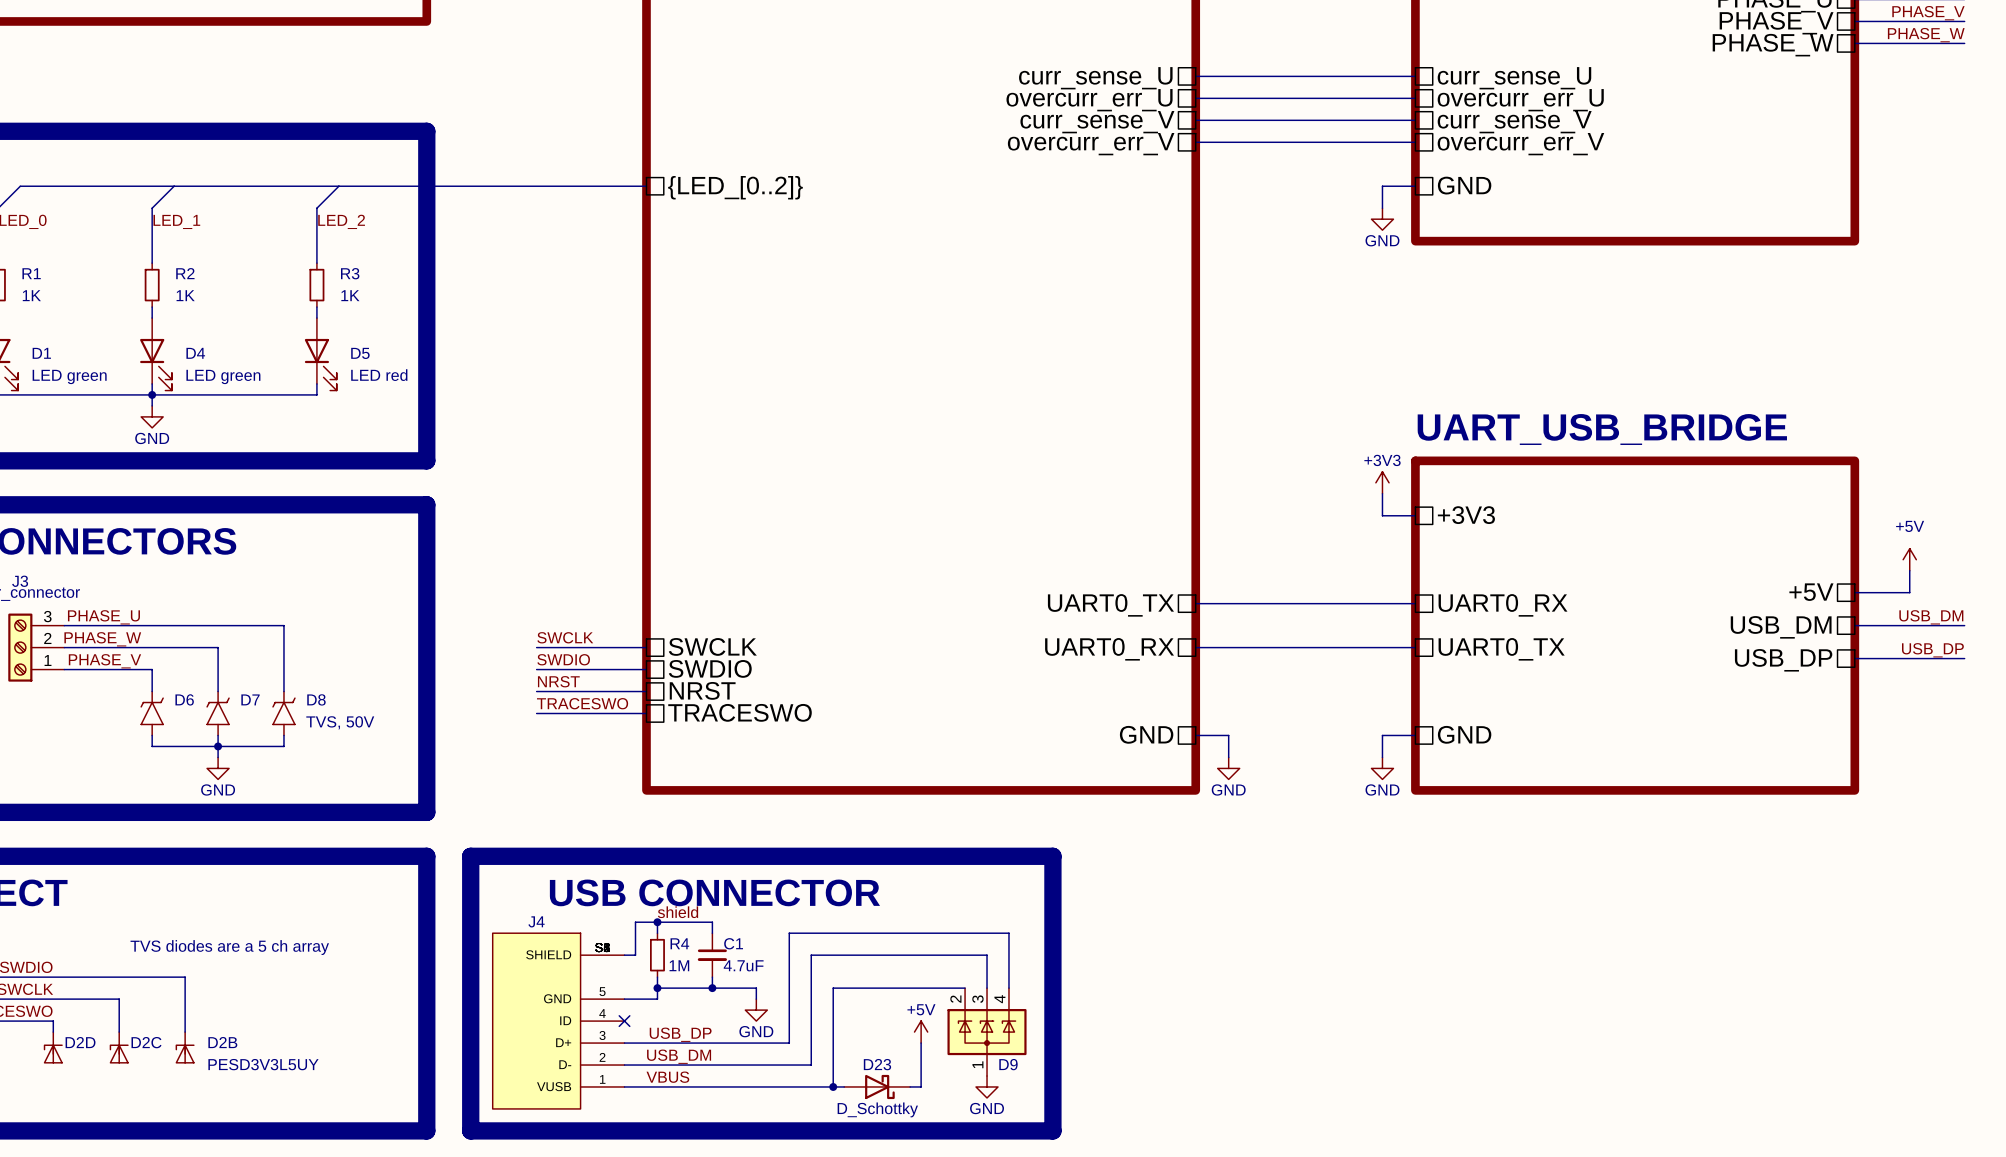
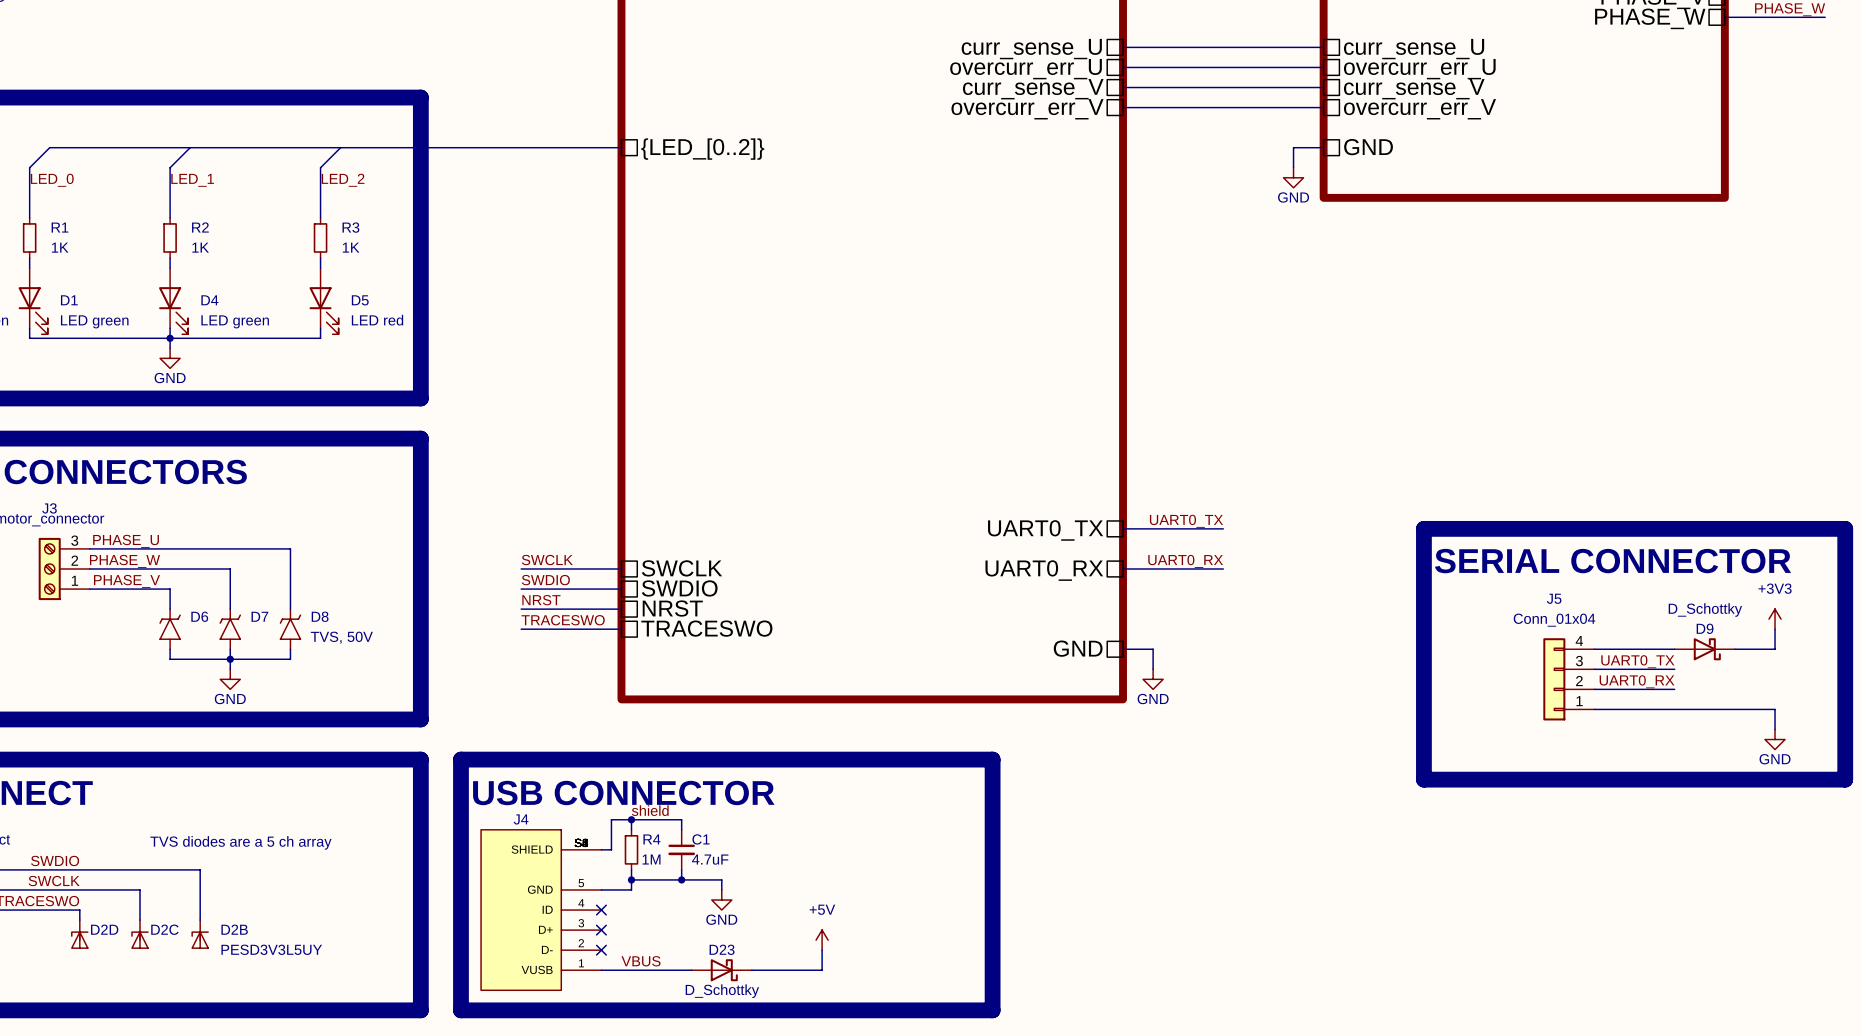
power symbol: +3V3 (1382, 482) -> none
wire: (1382, 493) (1382, 515) (1415, 515) -> none
sheet pin: +3V3 (1466, 515) -> none
power symbol: +5V (1909, 559) -> none
wire: (1909, 570) (1909, 592) (1854, 592) -> none
sheet pin: +5V (1811, 592) -> none
label: none -> UART0_TX (1186, 521)
wire: (1305, 603) (1415, 603) -> none
line: none -> (1423, 528) (1845, 528) (1845, 779) (1423, 779) (1423, 528)
sheet pin: UART0_RX (1503, 605) -> none
label: USB_DM (1931, 617) -> none
sheet UART_USB_BRIDGE: (1635, 625) -> none
wire: (1854, 625) (1964, 625) -> none
sheet pin: USB_DM (1781, 627) -> none
text: none -> SERIAL CONNECTOR (1613, 561)
label: none -> UART0_RX (1185, 561)
wire: (1305, 647) (1415, 647) -> none
sheet pin: UART0_TX (1501, 649) -> none
label: USB_DP (1932, 650) -> none
wire: (1854, 658) (1964, 658) -> none
sheet pin: USB_DP (1783, 660) -> none
D9 value: none -> D_Schottky (1705, 609)
power symbol: none -> +3V3 (1775, 619)
wire: none -> (1775, 629) (1775, 649) (1734, 649)
sheet pin: GND (1464, 734) -> none
wire: (1415, 735) (1382, 735) (1382, 757) -> none
wire: none -> (1594, 649) (1674, 649)
label: none -> UART0_TX (1637, 661)
wire: none -> (1594, 669) (1674, 669)
power symbol: GND (1382, 768) -> none
J5: none -> Conn_01x04 (1568, 679)
label: none -> UART0_RX (1637, 681)
wire: none -> (1594, 689) (1674, 689)
wire: none -> (1594, 709) (1775, 709) (1775, 729)
power symbol: none -> GND (1775, 739)
text position: USB CONNECTOR (714, 892) -> USB CONNECTOR (623, 793)
D9 symbol: [947, 988, 1027, 1077] -> [1674, 638, 1735, 661]
wire: (965, 988) (833, 988) (833, 1086) -> none
wire: (987, 988) (987, 955) (811, 955) (811, 1065) (624, 1065) -> none
wire: (1008, 988) (1008, 933) (789, 933) (789, 1043) (624, 1043) -> none
power symbol text position: +5V (921, 1009) -> +5V (822, 909)
power symbol position: +5V (921, 1032) -> +5V (822, 940)
label: USB_DP (680, 1034) -> none
no-connect mark: none -> (601, 930)
wire: (921, 1043) (921, 1086) (910, 1086) -> none
label: USB_DM (679, 1056) -> none
D9 name position: D9 (1008, 1064) -> D9 (1705, 628)
no-connect mark: none -> (601, 950)
junction: (833, 1086) -> none
D23 position: (877, 1086) -> (721, 970)
power symbol: GND (987, 1086) -> none

